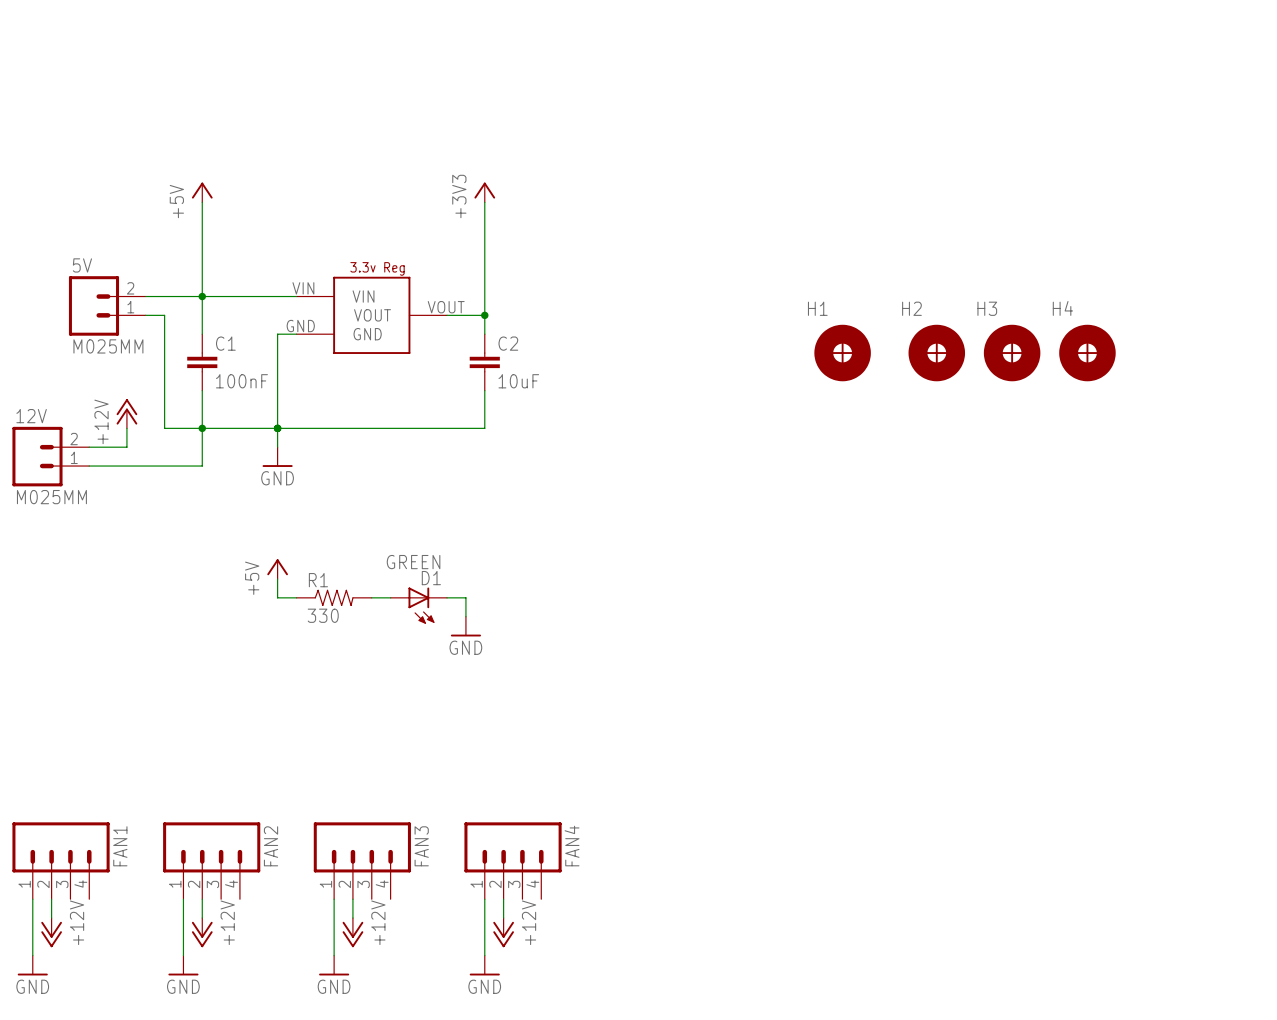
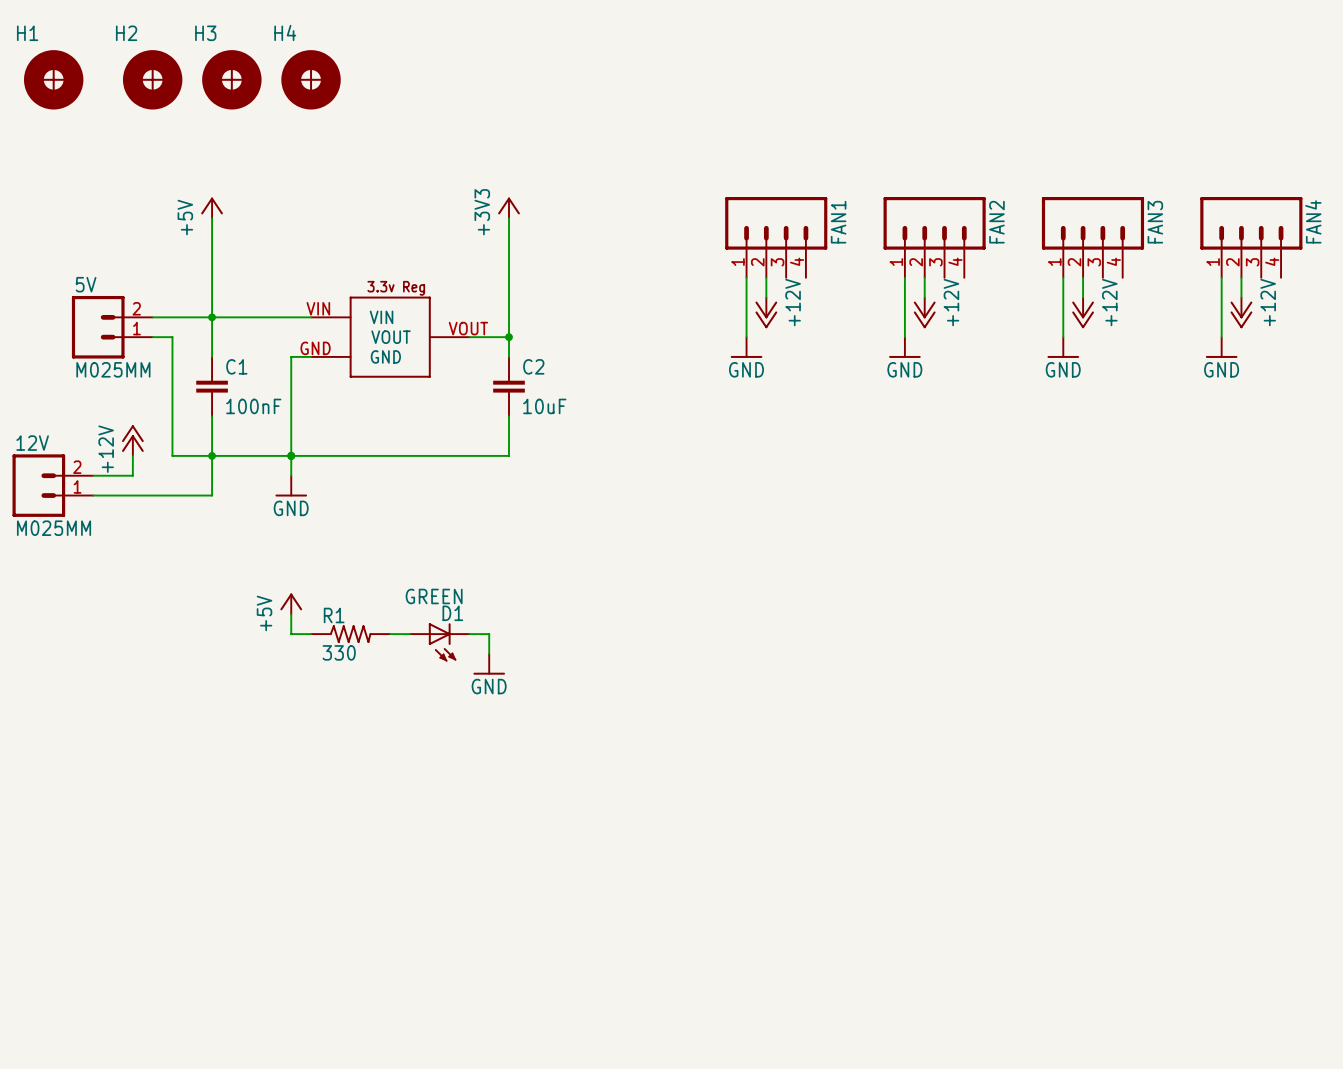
wire: none -> (746, 277) (746, 337)
wire: none -> (766, 277) (766, 297)
wire: none -> (904, 277) (904, 337)
wire: none -> (924, 277) (924, 297)
wire: none -> (1063, 277) (1063, 337)
wire: none -> (1083, 277) (1083, 297)
wire: none -> (1221, 277) (1221, 337)
wire: none -> (1241, 277) (1241, 297)
power symbol: none -> +12V (766, 312)
power symbol: none -> +12V (924, 312)
power symbol: none -> +12V (1083, 312)
power symbol: none -> +12V (1241, 312)
power symbol: none -> GND (746, 347)
power symbol: none -> GND (904, 347)
power symbol: none -> GND (1063, 347)
power symbol: none -> GND (1221, 347)
H1 position: (842, 353) -> (53, 79)
H2 position: (936, 353) -> (152, 79)
H3 position: (1012, 353) -> (231, 79)
H4 position: (1087, 353) -> (311, 79)
FAN1 position: (61, 860) -> (776, 237)
FAN2 position: (211, 860) -> (934, 237)
FAN3 position: (362, 860) -> (1092, 237)
FAN4 position: (513, 860) -> (1251, 237)
wire: (32, 899) (32, 955) -> none
wire: (51, 899) (51, 918) -> none
wire: (183, 899) (183, 955) -> none
wire: (202, 899) (202, 918) -> none
wire: (334, 899) (334, 955) -> none
wire: (352, 899) (352, 918) -> none
wire: (484, 899) (484, 955) -> none
wire: (503, 899) (503, 918) -> none
power symbol: +12V (51, 932) -> none
power symbol: +12V (202, 932) -> none
power symbol: +12V (352, 932) -> none
power symbol: +12V (503, 932) -> none
power symbol: GND (32, 965) -> none
power symbol: GND (183, 965) -> none
power symbol: GND (334, 965) -> none
power symbol: GND (484, 965) -> none

